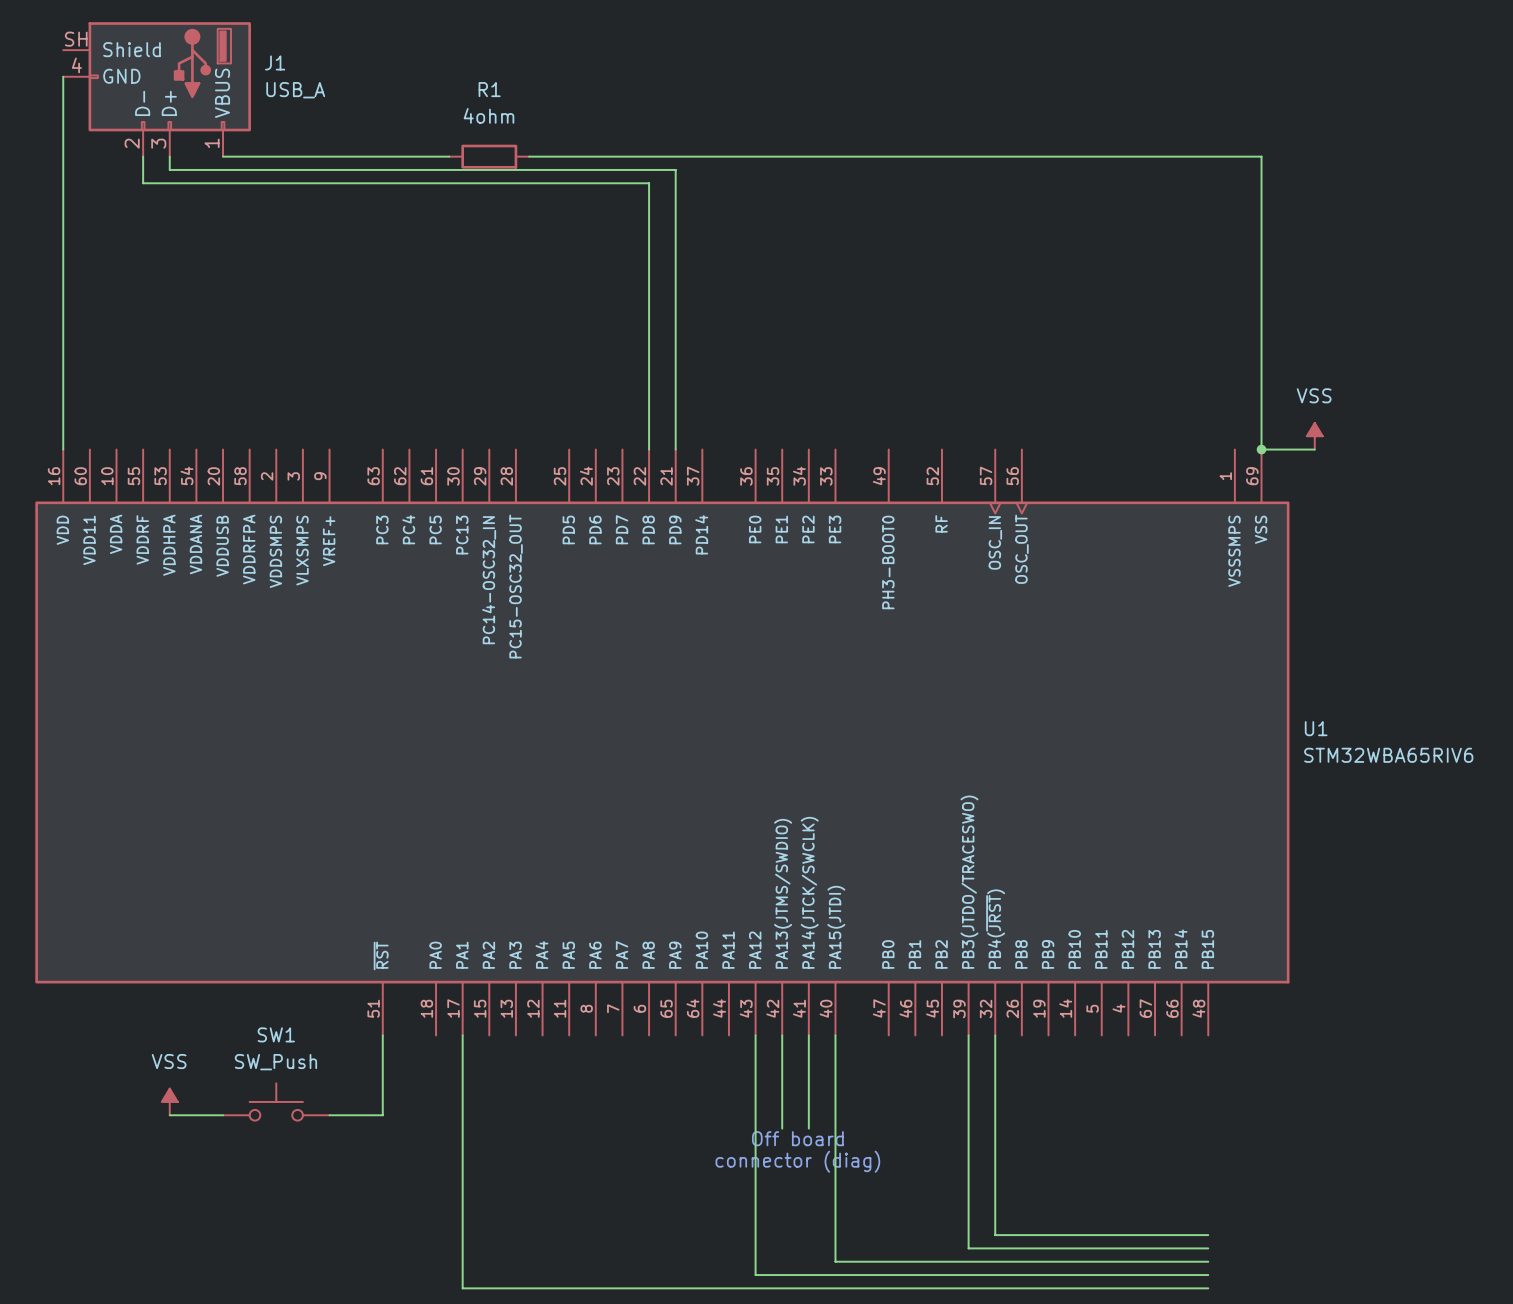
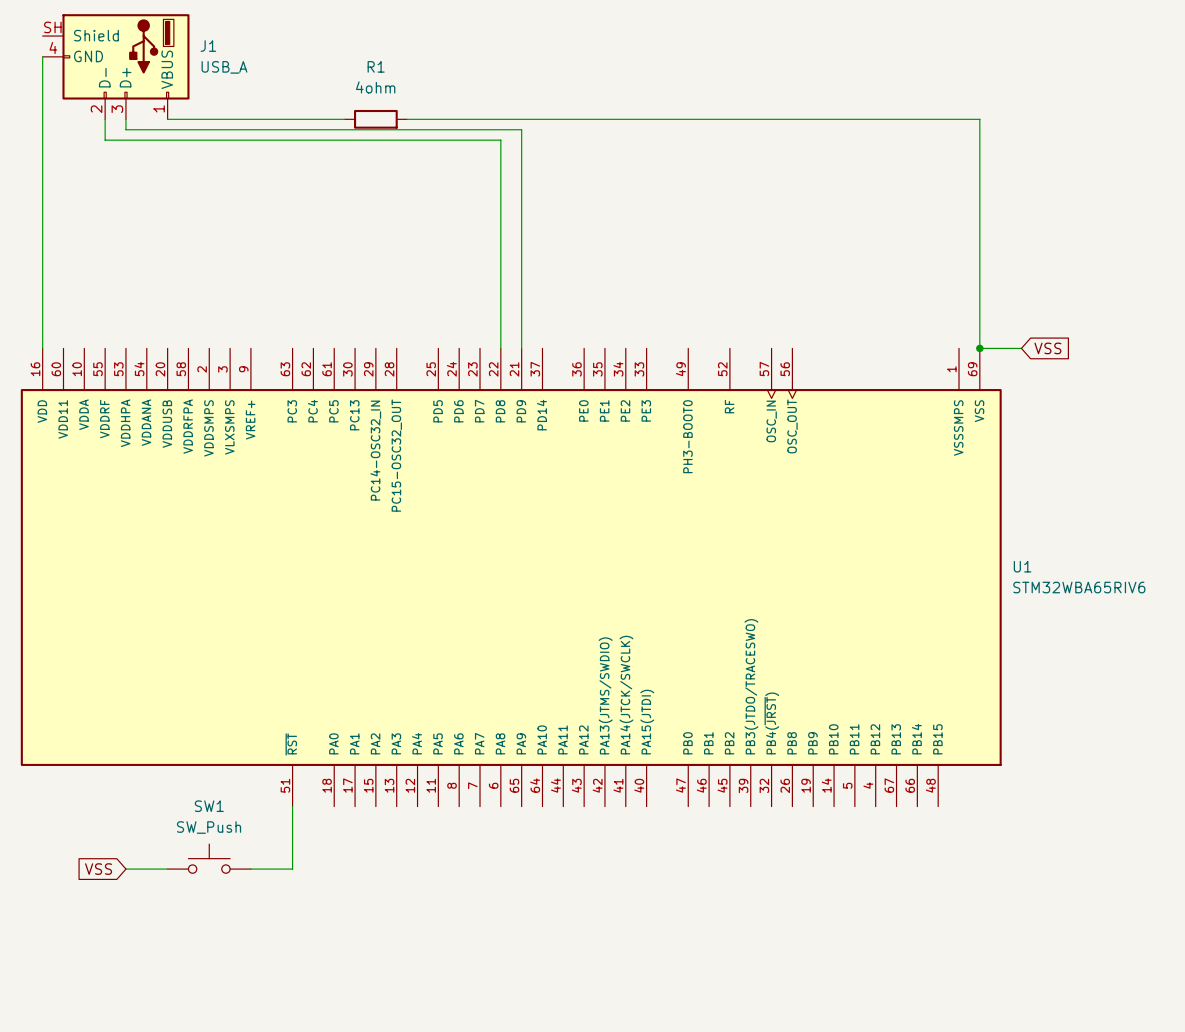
power symbol: VSS (1314, 436) -> none
global label: none -> VSS (1047, 348)
wire: (462, 1035) (462, 1288) (1208, 1288) -> none
wire: (755, 1035) (755, 1275) (1208, 1275) -> none
wire: (782, 1035) (782, 1128) -> none
wire: (808, 1035) (808, 1128) -> none
wire: (835, 1035) (835, 1261) (1208, 1261) -> none
wire: (968, 1035) (968, 1248) (1208, 1248) -> none
wire: (995, 1035) (995, 1235) (1208, 1235) -> none
power symbol: VSS (169, 1101) -> none
global label: none -> VSS (98, 869)
text: Off board (797, 1138) -> none
text: connector (diag) (797, 1161) -> none

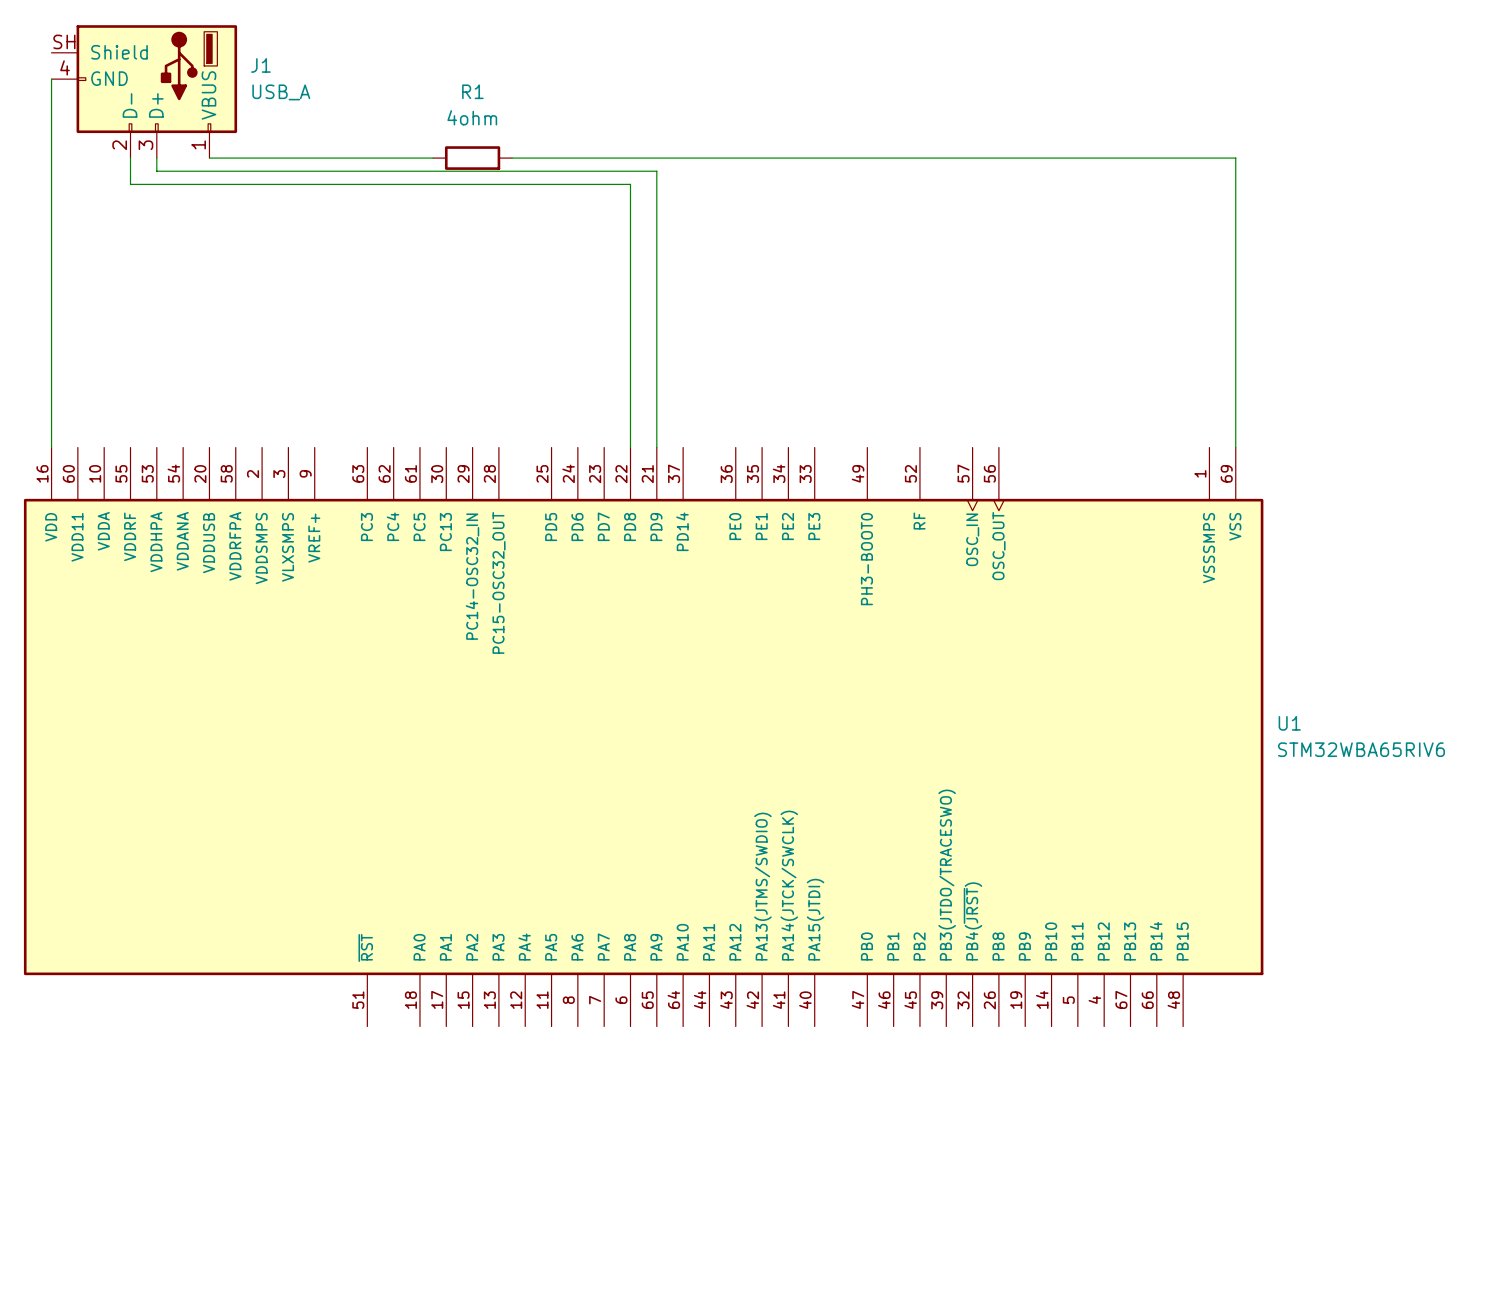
wire: (979, 348) (1021, 348) -> none
junction: (979, 348) -> none
global label: VSS (1047, 348) -> none
wire: (292, 806) (292, 869) (250, 869) -> none
SW1: SW_Push (209, 858) -> none
global label: VSS (98, 869) -> none
wire: (125, 869) (167, 869) -> none

